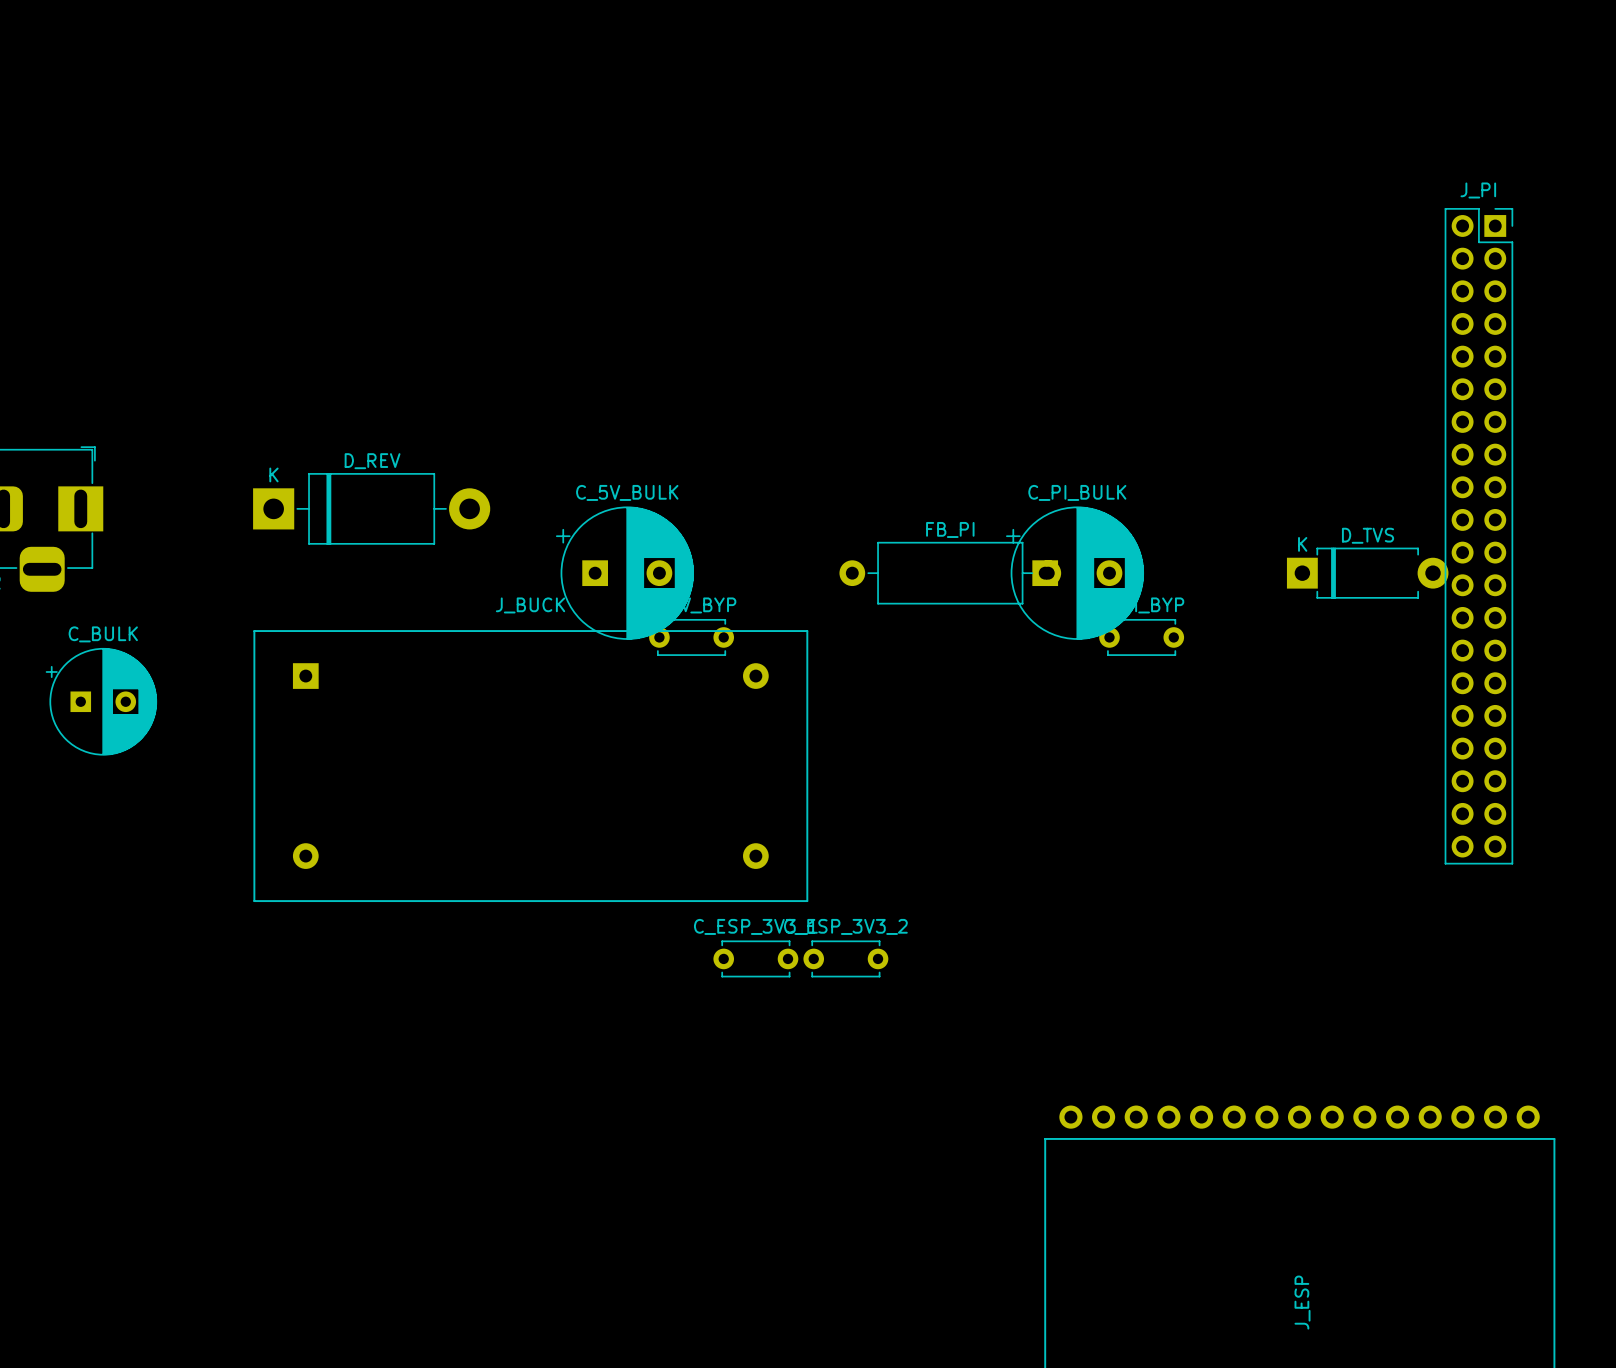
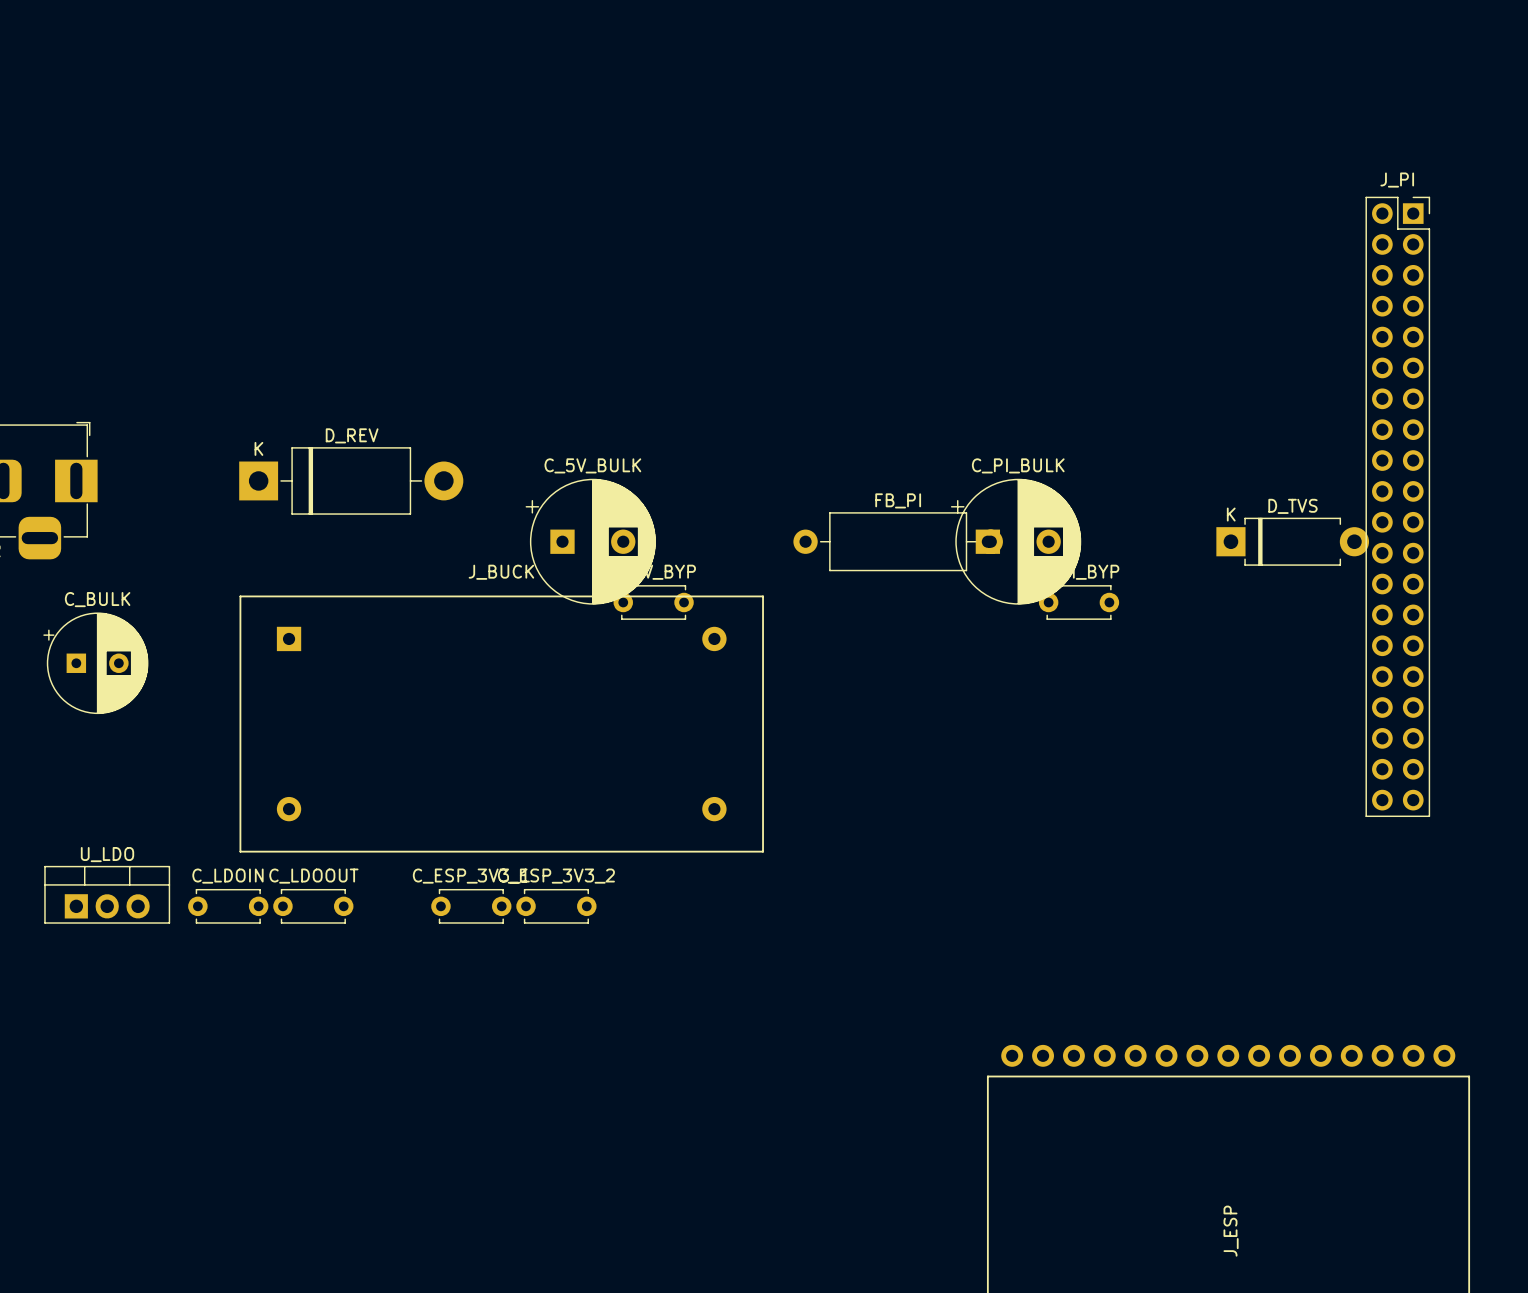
U_LDO: none -> (107, 894)
C_LDOIN: none -> (228, 906)
C_LDOOUT: none -> (313, 906)
C_ESP_3V3_1 position: (755, 958) -> (471, 906)
C_ESP_3V3_2 position: (845, 958) -> (556, 906)

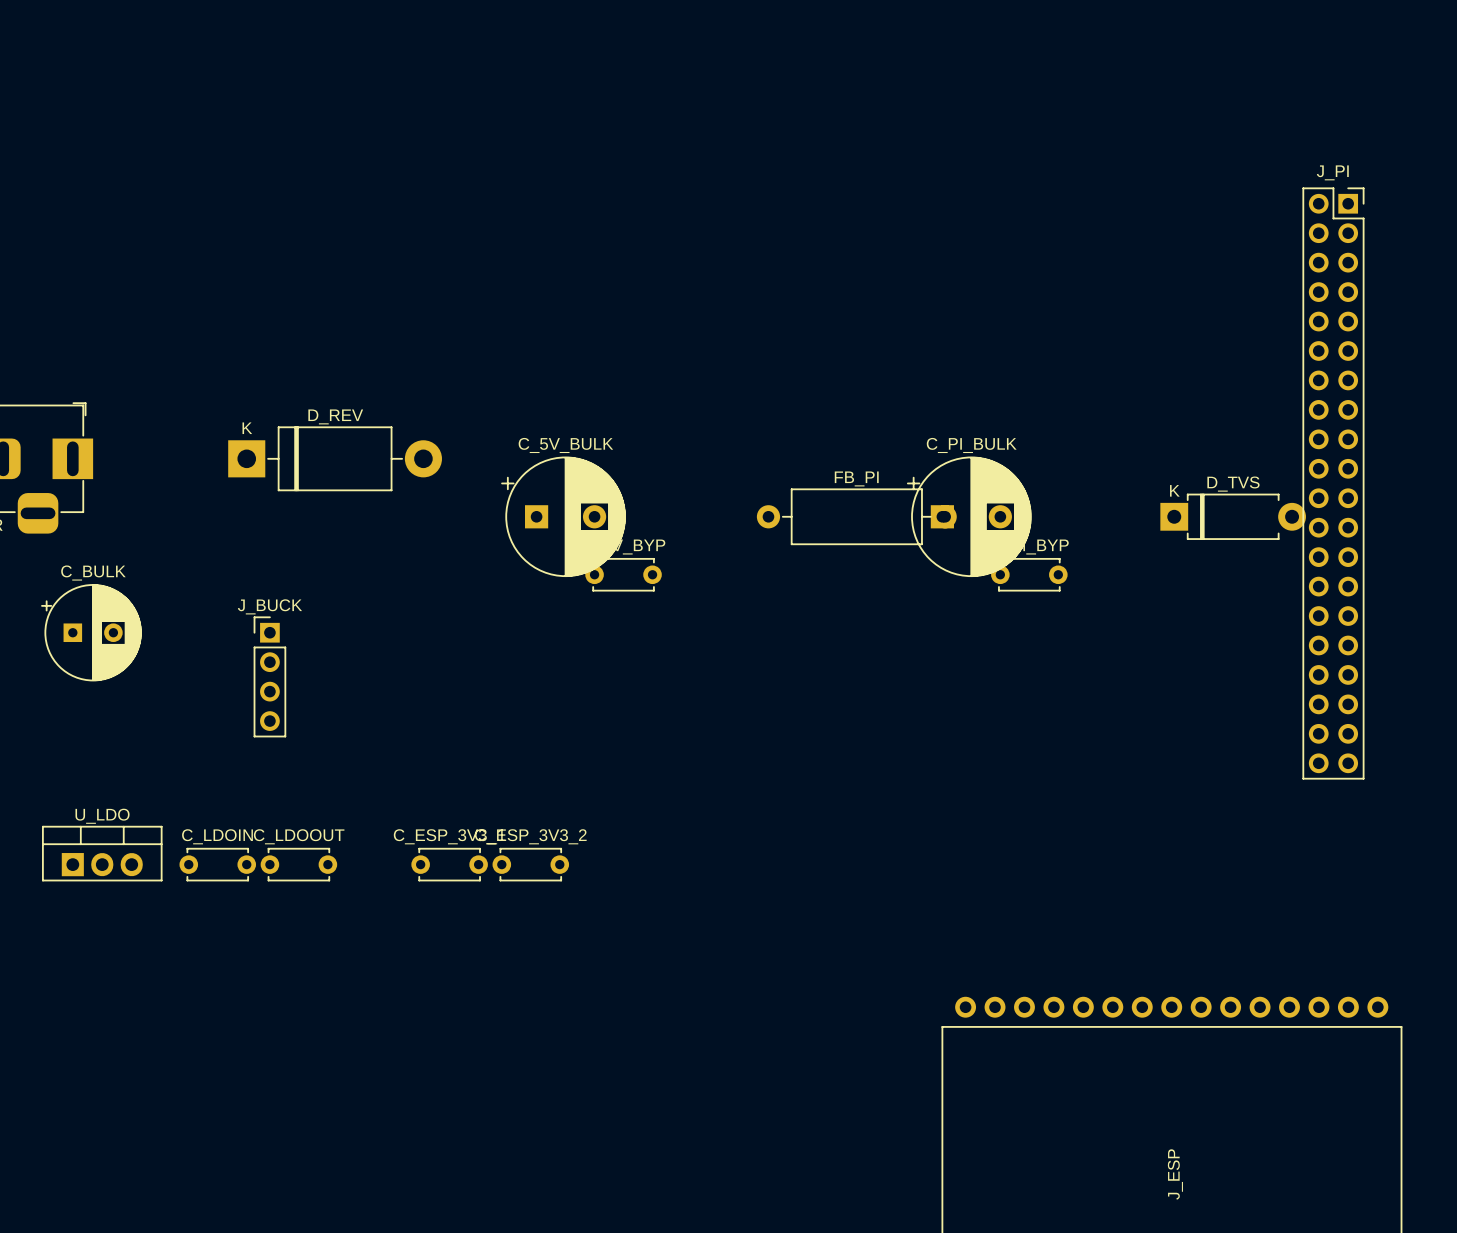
J_BUCK: none -> (269, 676)
J_BUCK: (501, 724) -> none

